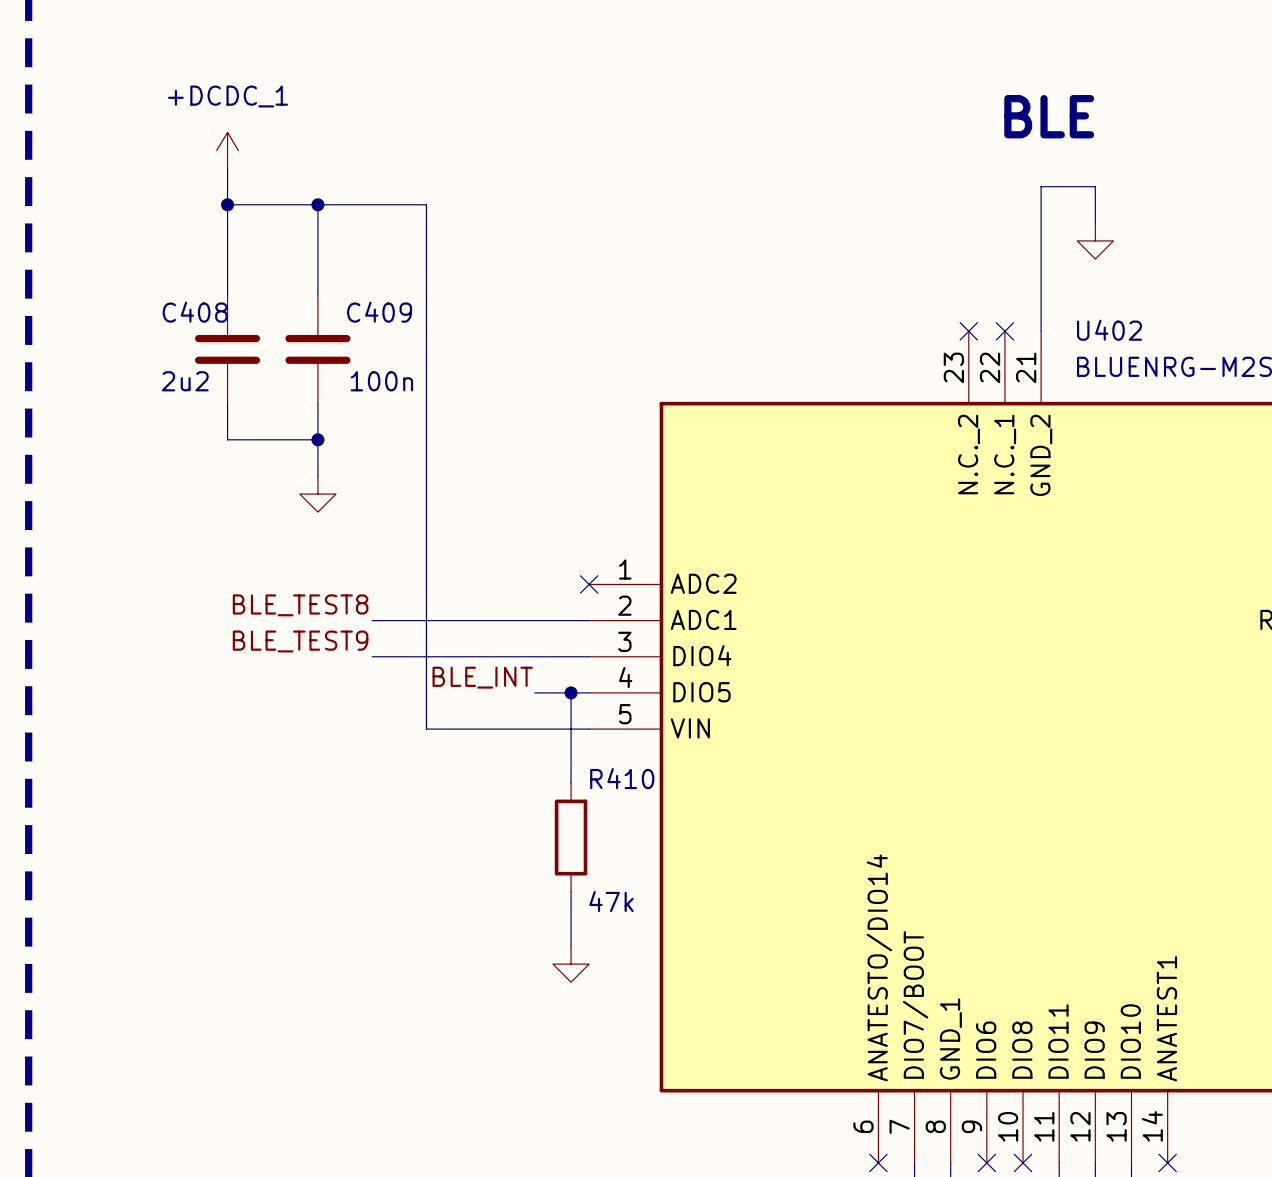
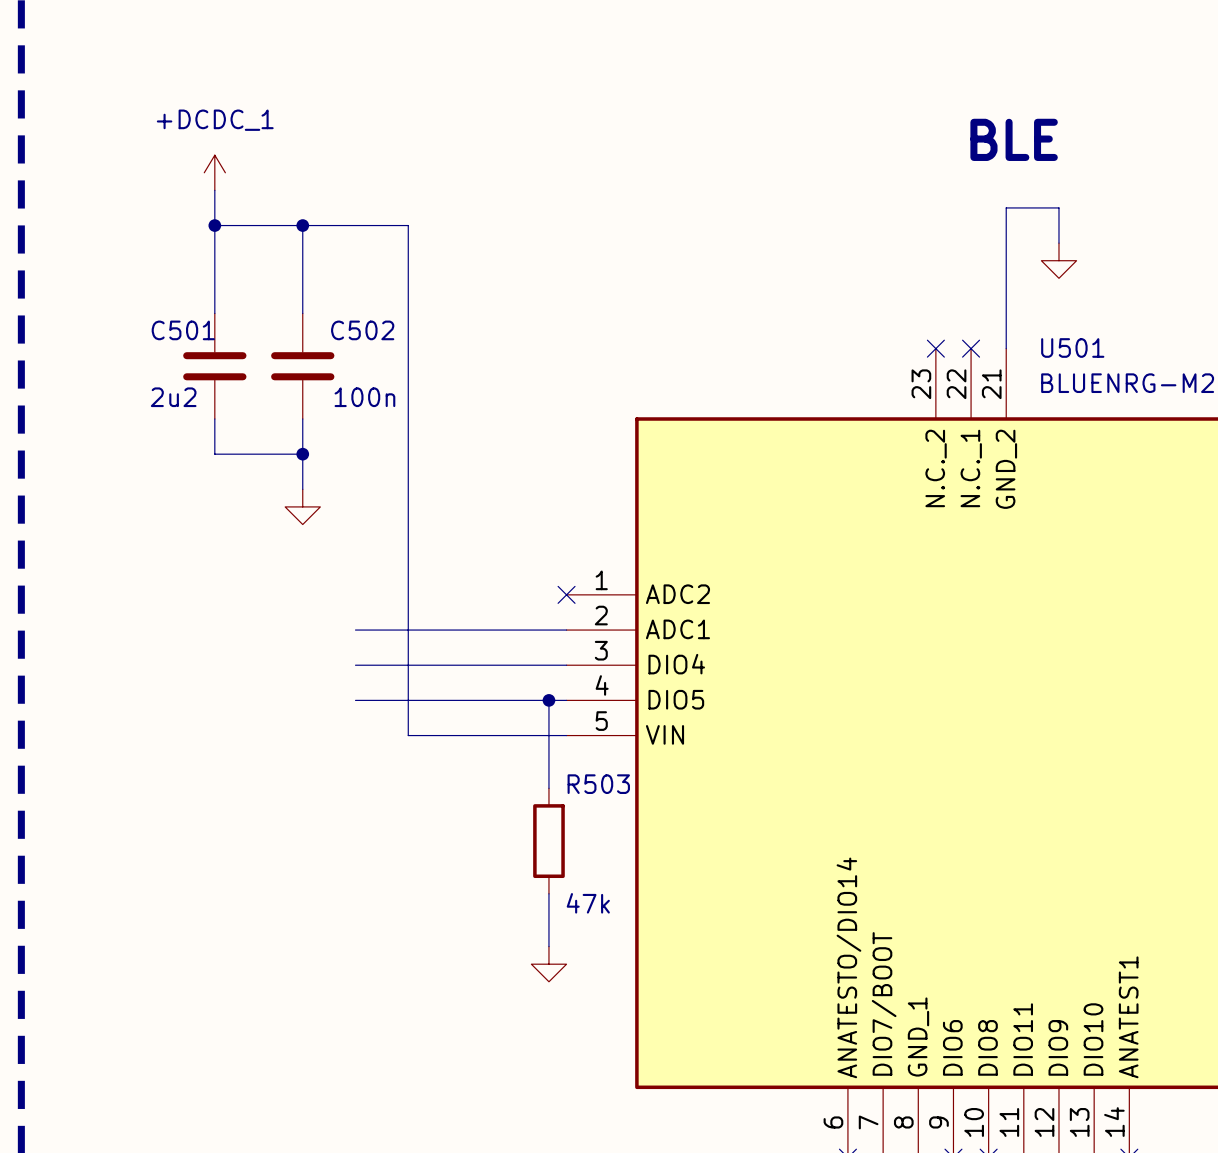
C408 name: C408 (195, 312) -> C501 (183, 330)
C409 name: C409 (379, 312) -> C502 (362, 330)
U402 name: U402 (1109, 330) -> U501 (1072, 347)
label: BLE_TEST8 (300, 605) -> none
label: BLE_TEST9 (300, 641) -> none
label: BLE_INT (482, 677) -> none
wire: none -> (355, 700) (513, 700)
R410 name: R410 (622, 778) -> R503 (598, 784)

